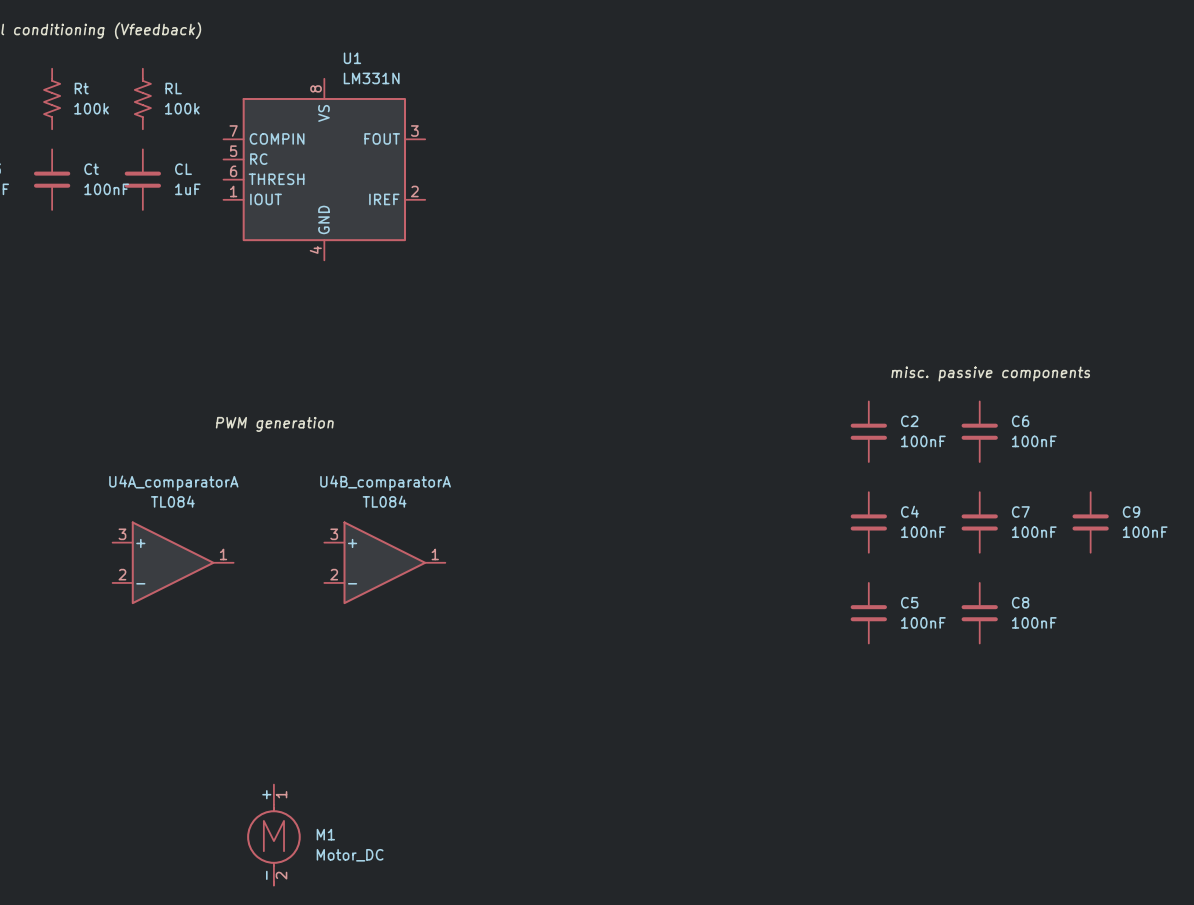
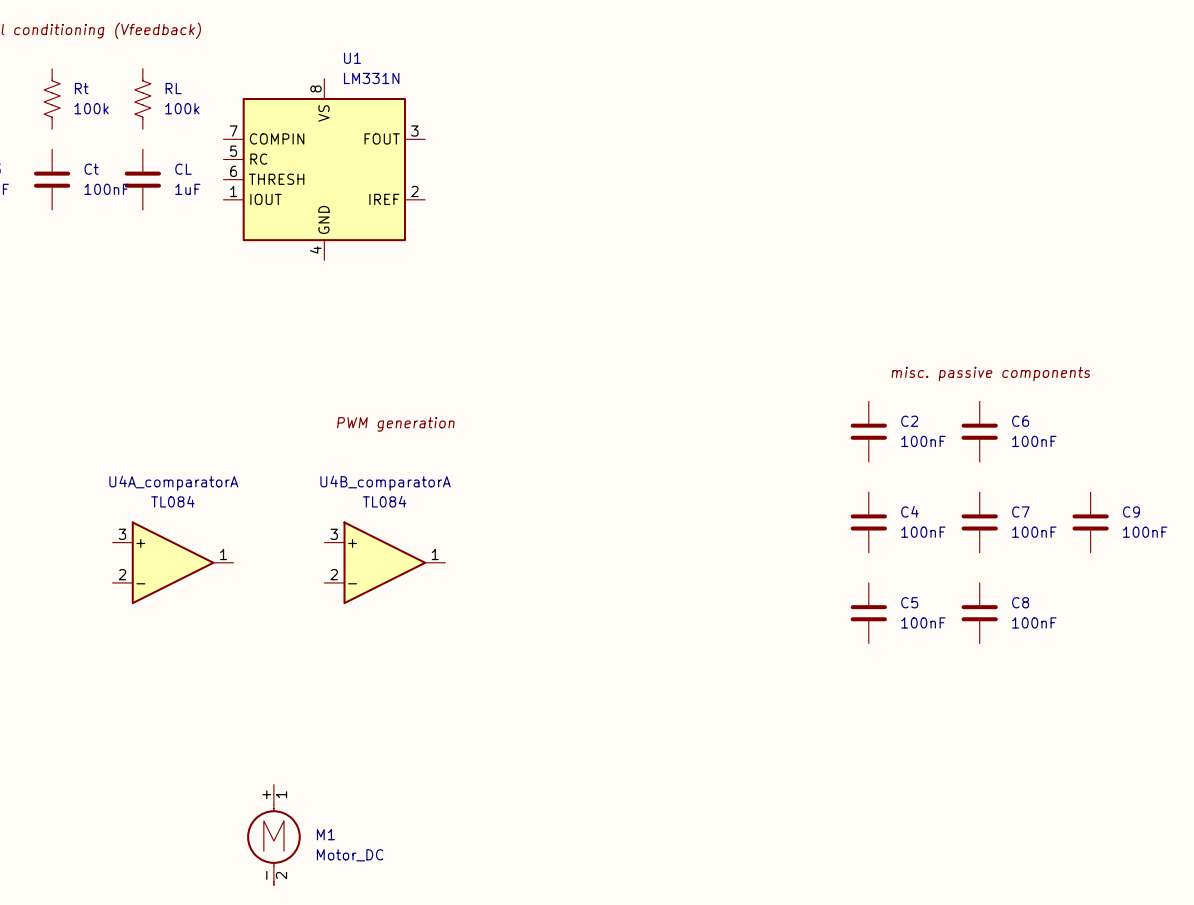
label position: PWM generation (274, 424) -> PWM generation (395, 424)

